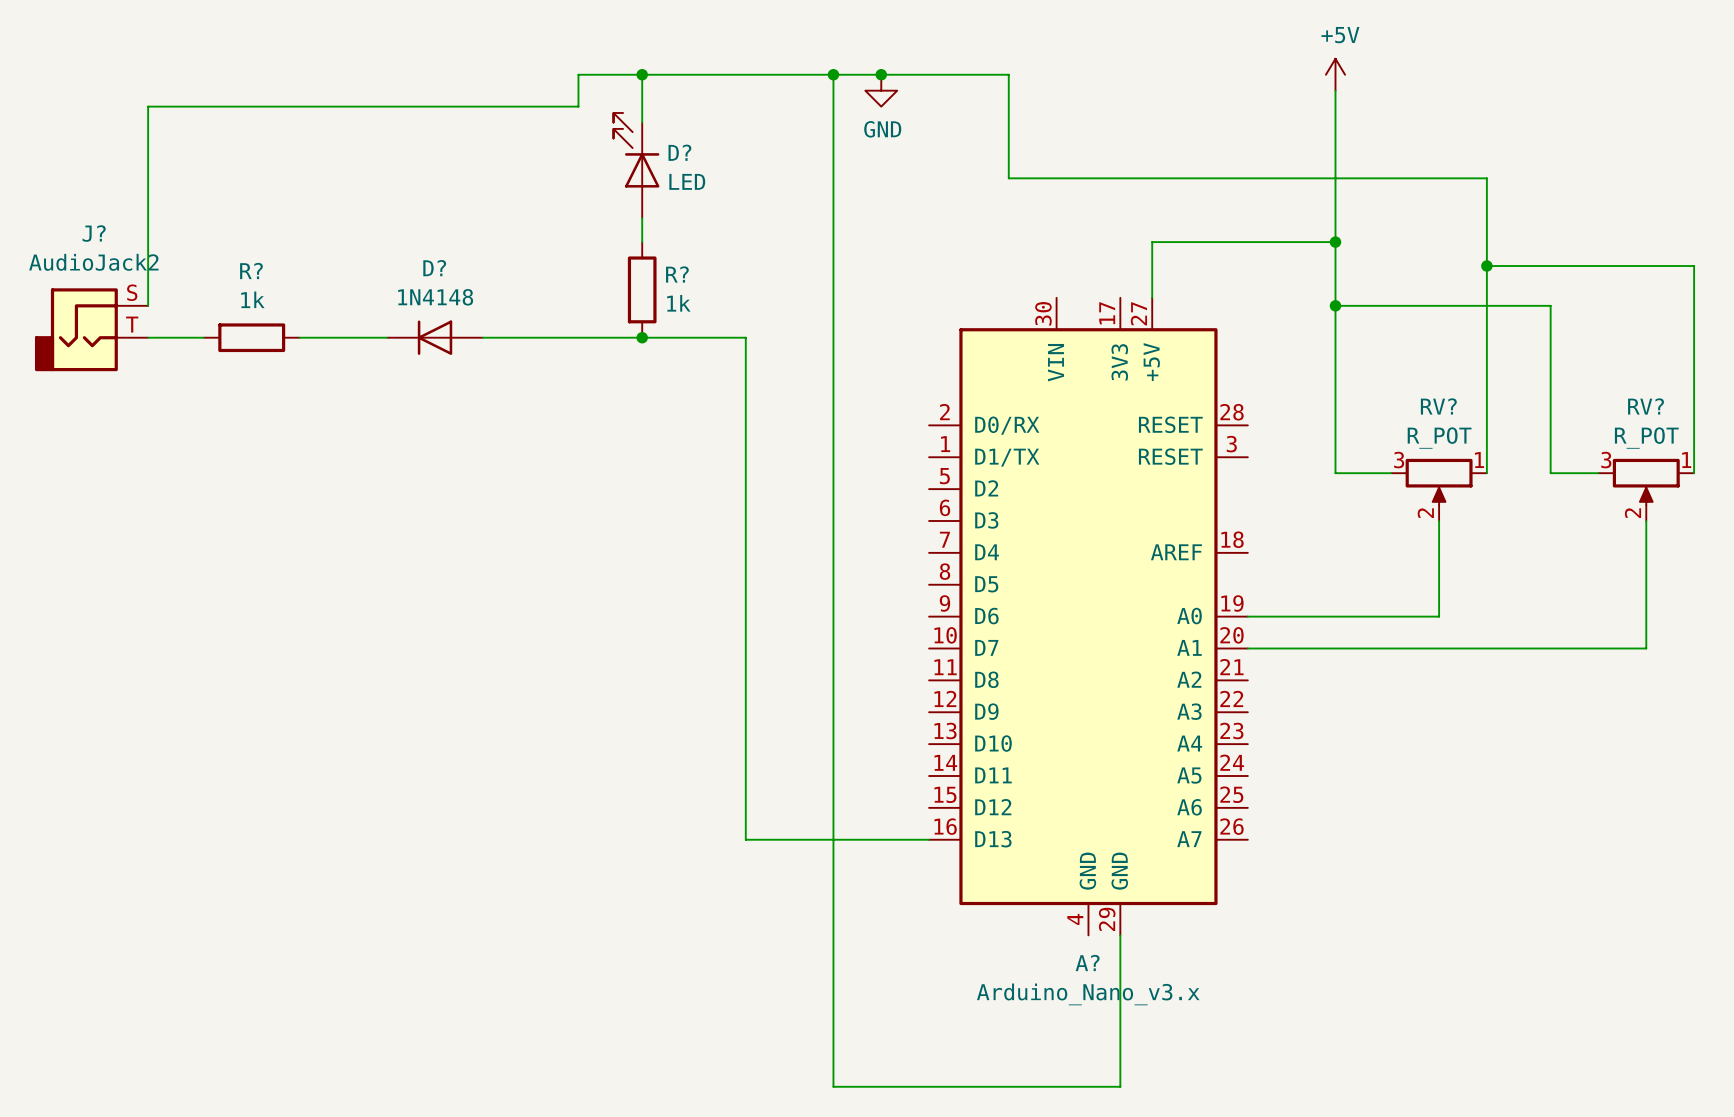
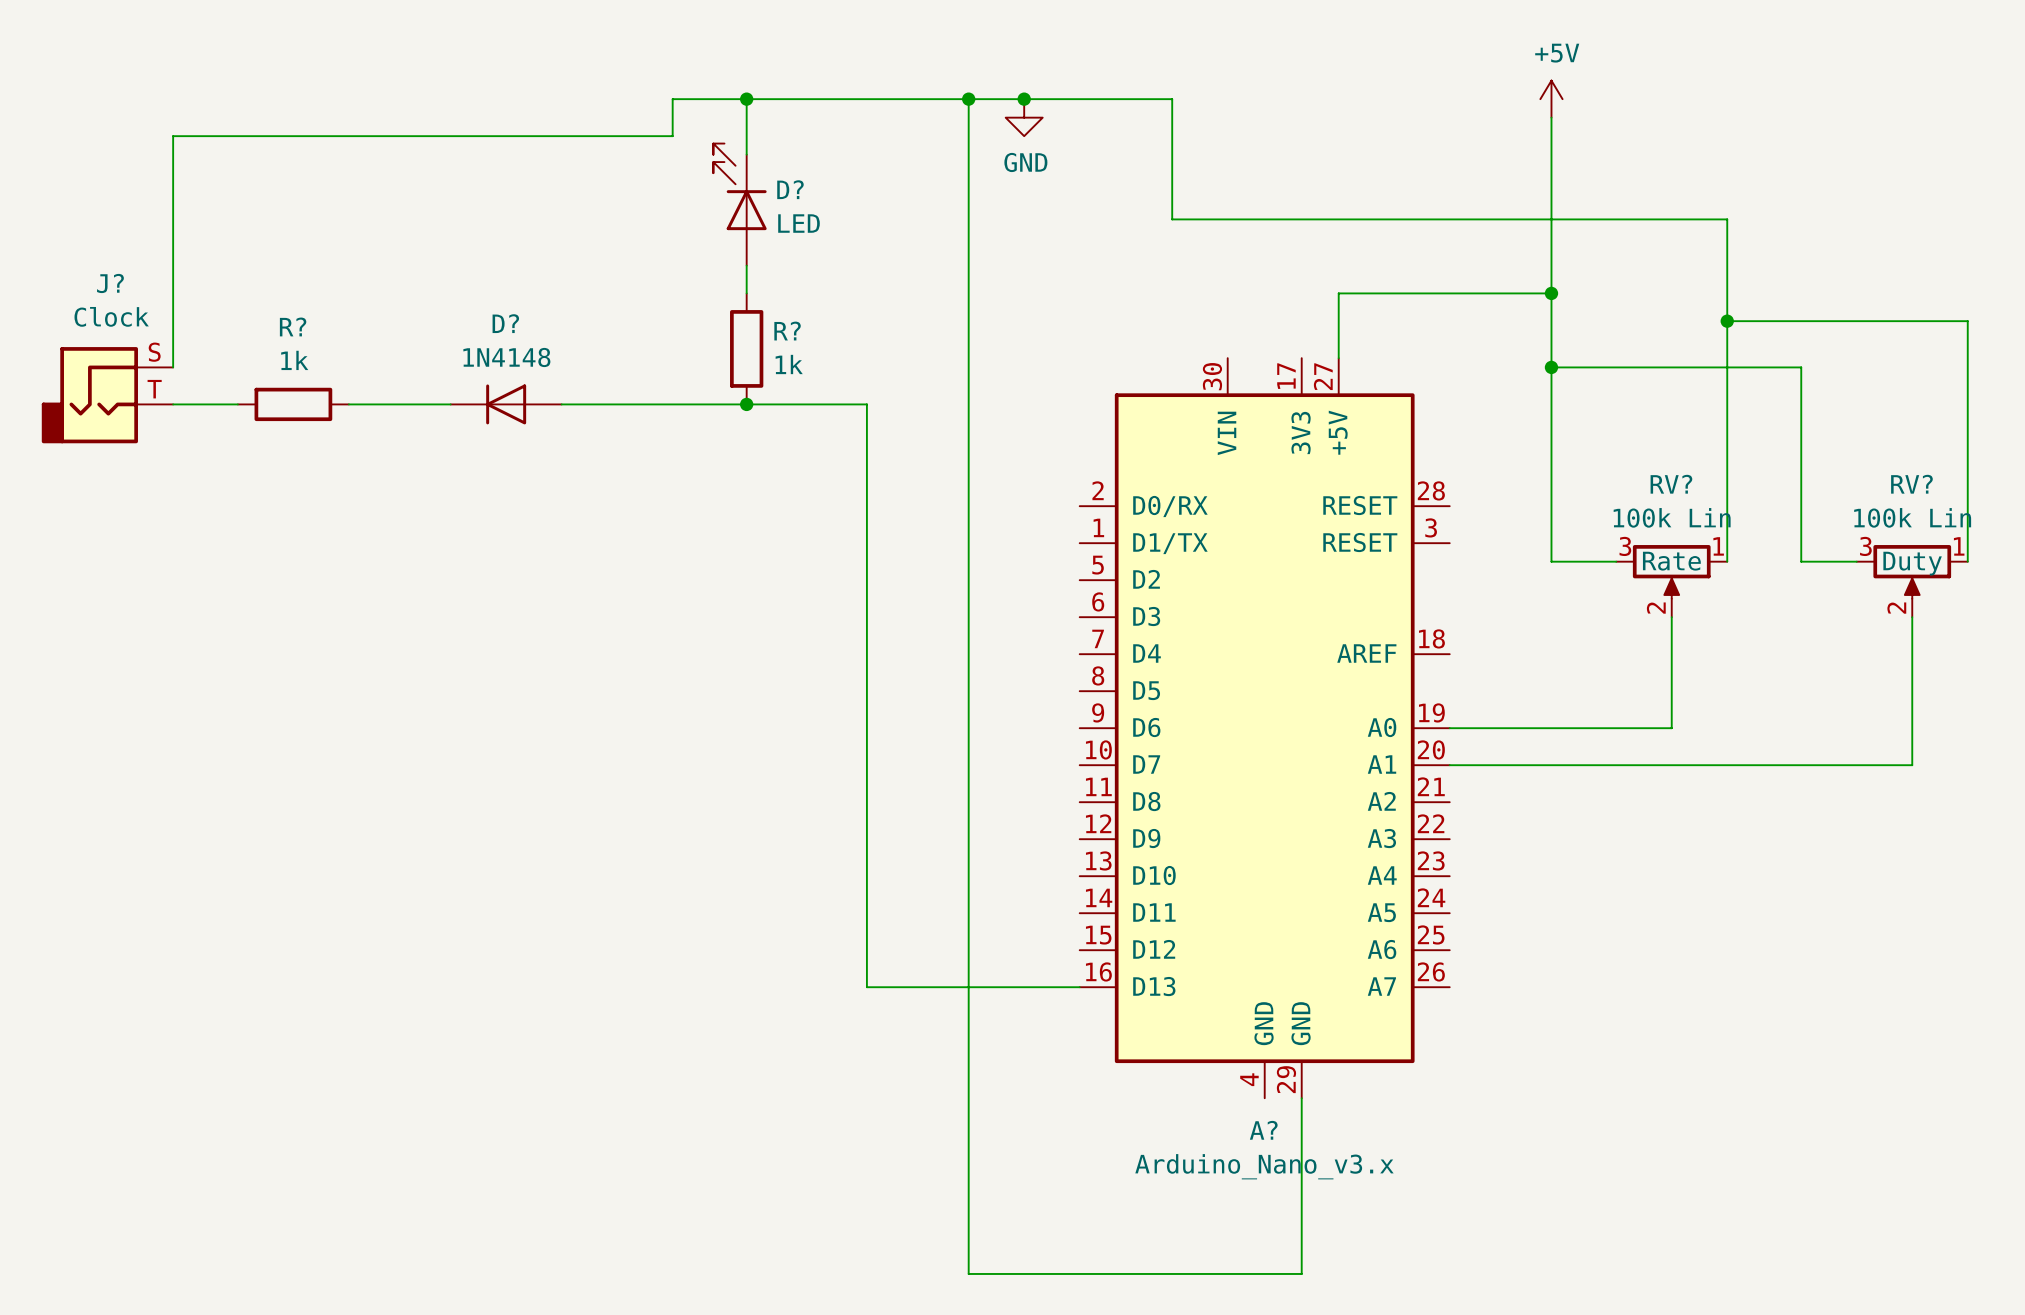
J? value: AudioJack2 (93, 262) -> Clock (111, 316)
RV? value: R_POT (1439, 438) -> 100k Lin (1672, 517)
RV? value: R_POT (1646, 438) -> 100k Lin (1912, 517)
RV? text: none -> Rate (1671, 561)
RV? text: none -> Duty (1912, 563)

